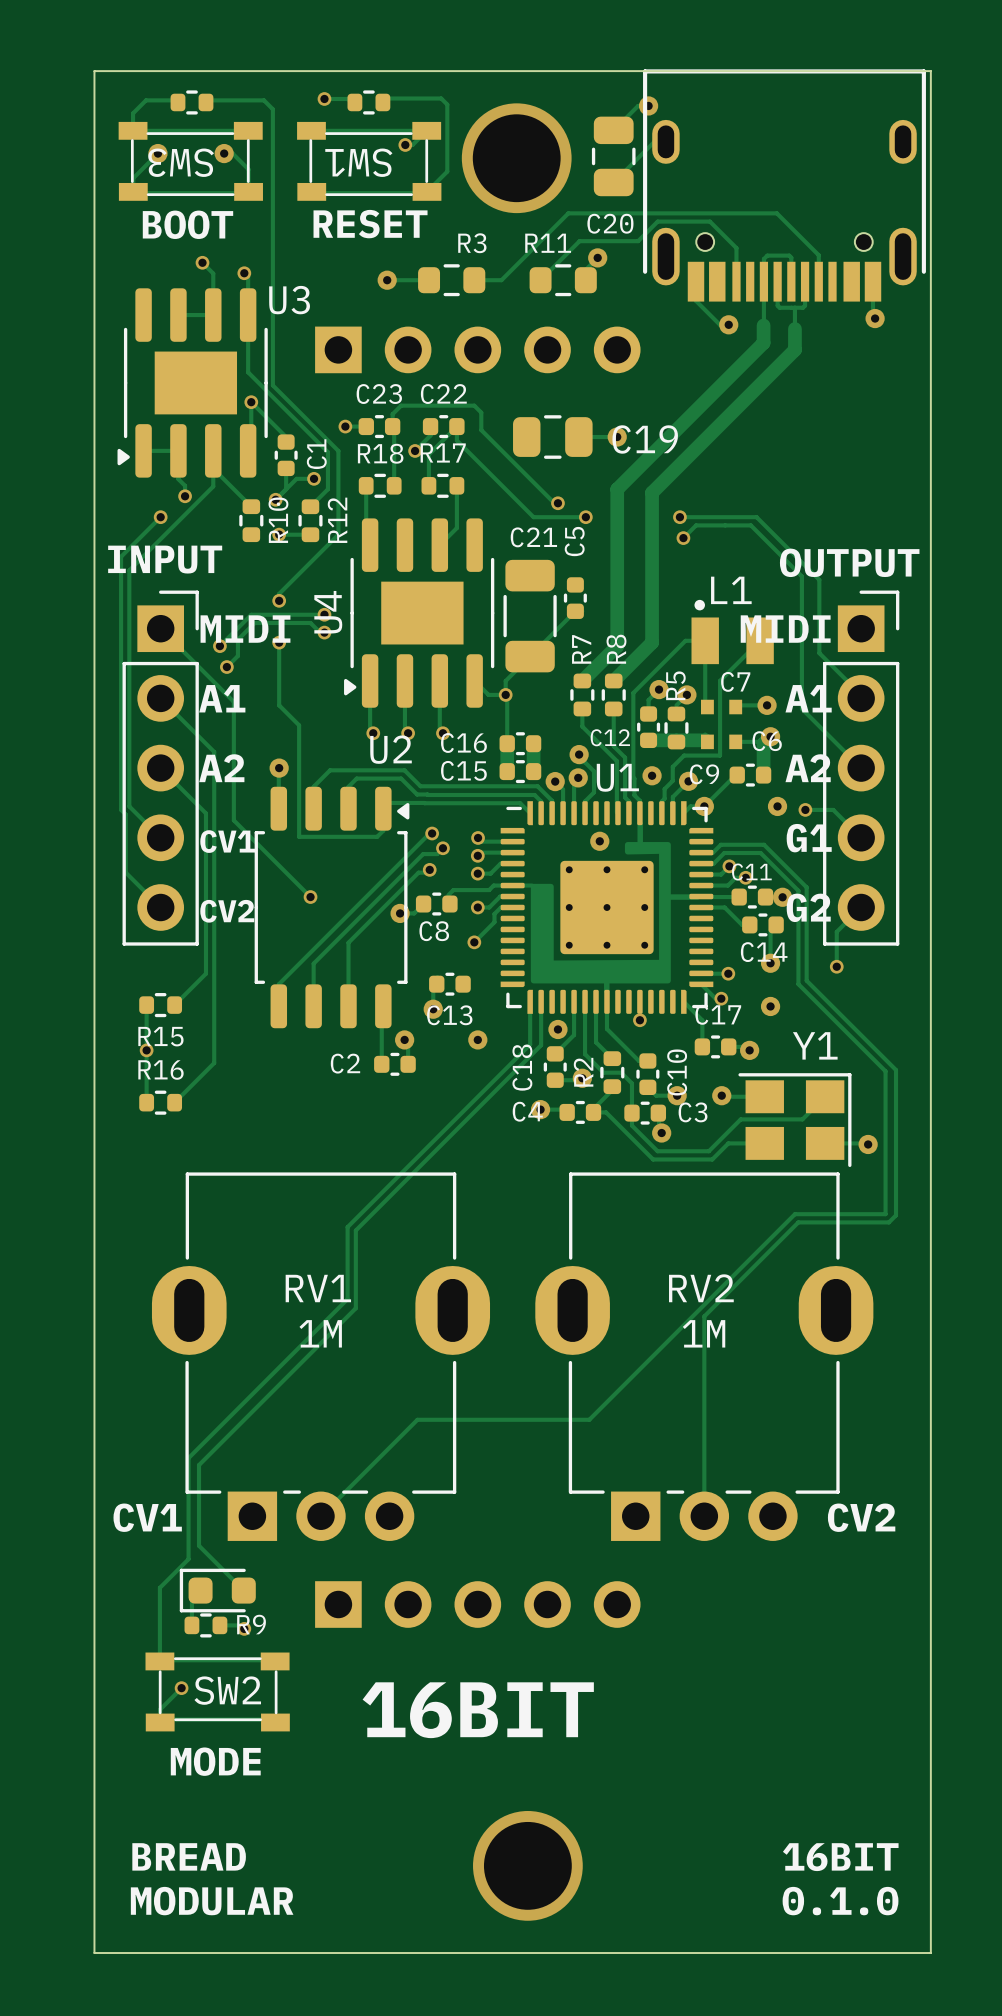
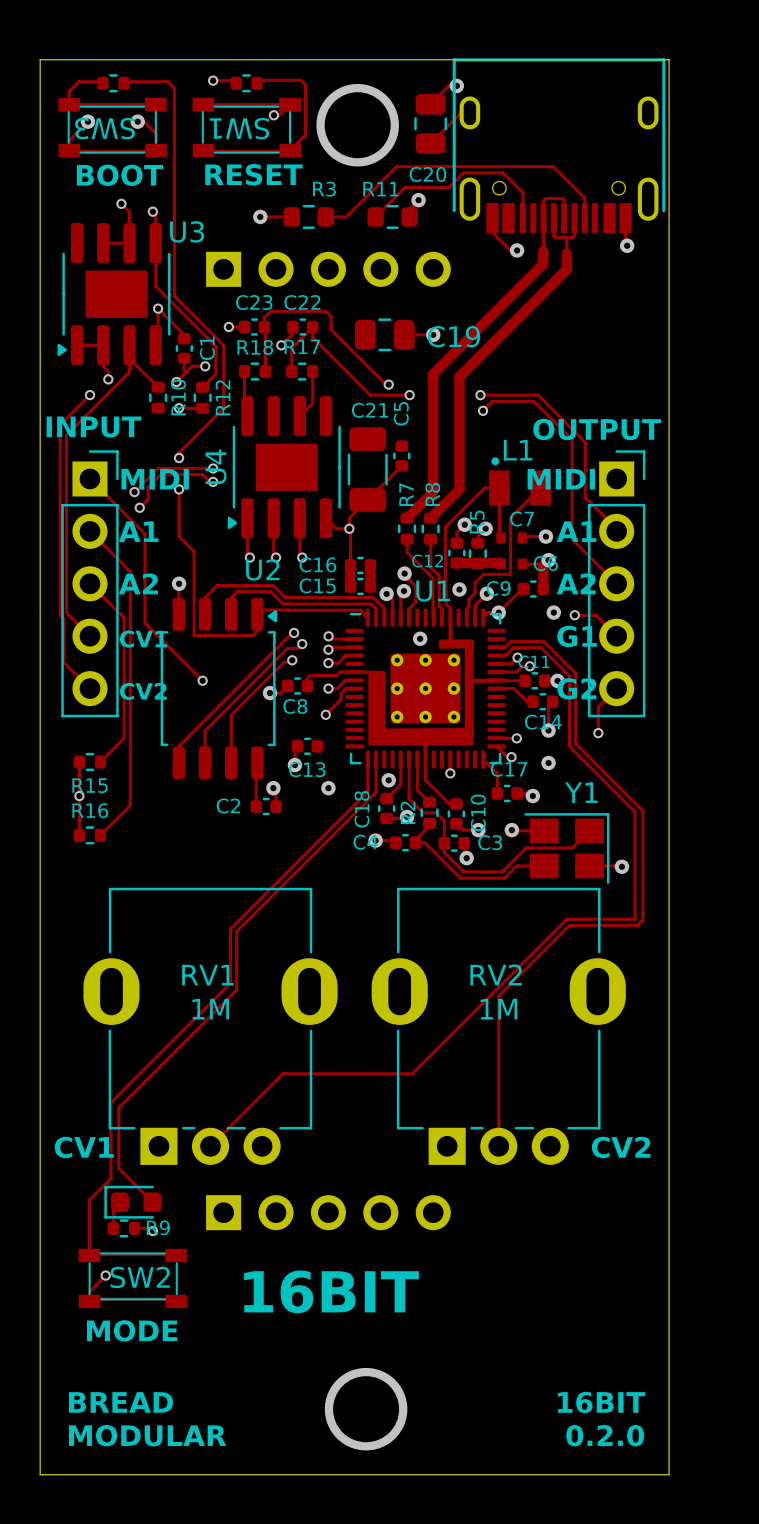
text: 0.1.0 (840, 1901) -> 0.2.0 (605, 1435)

